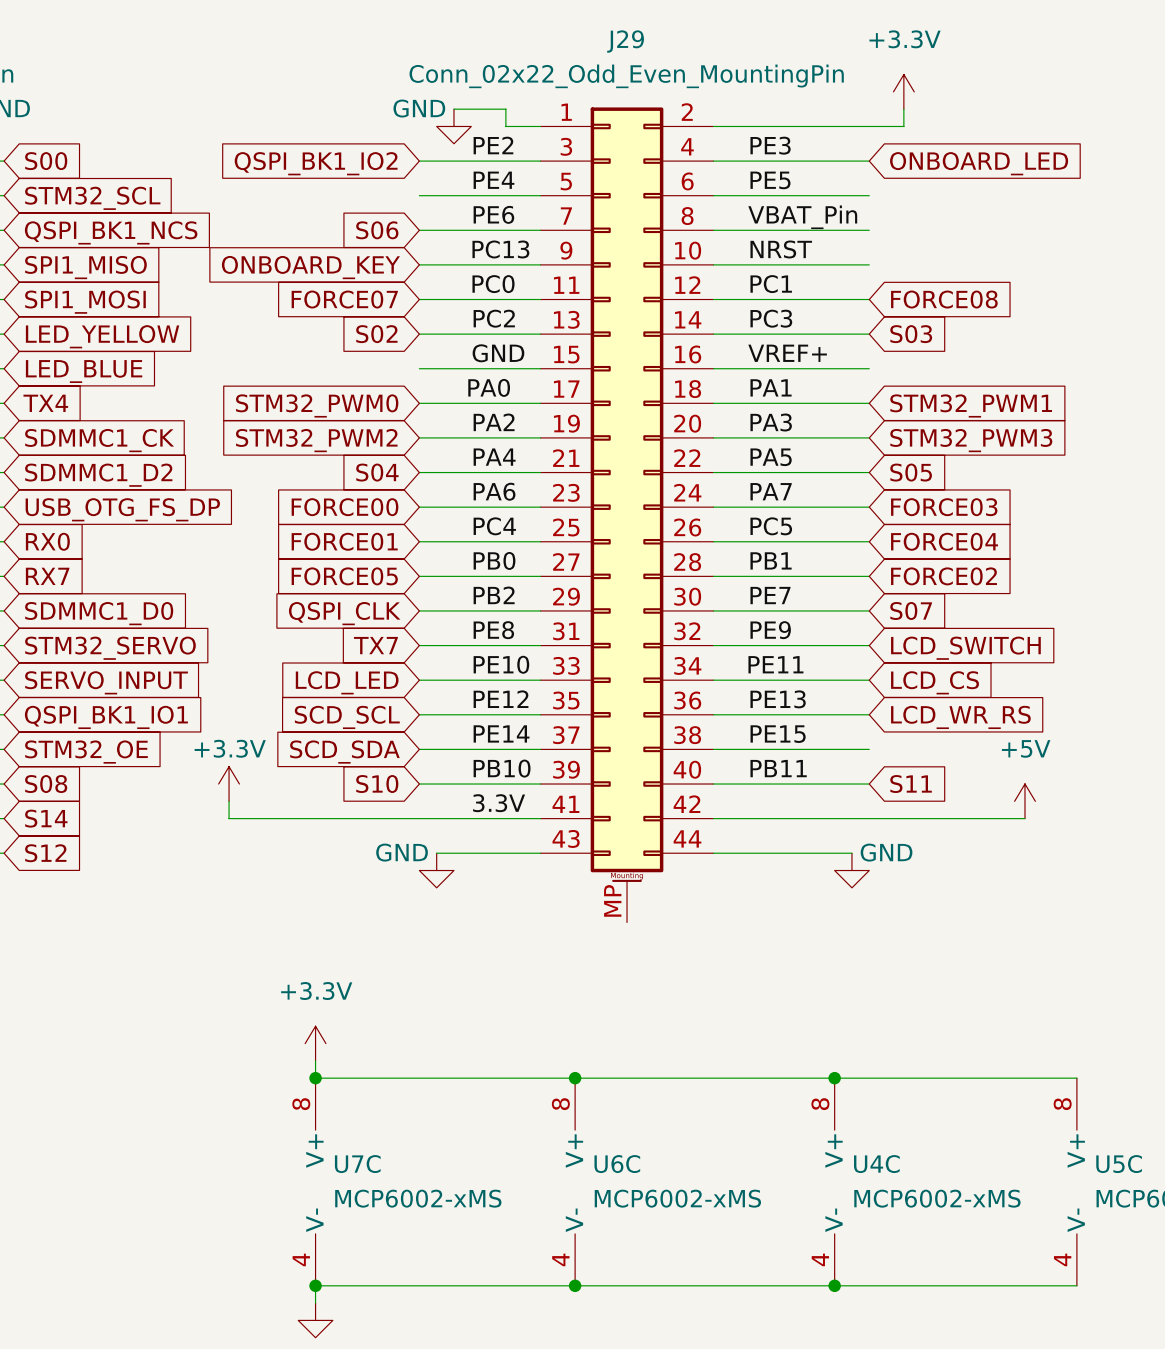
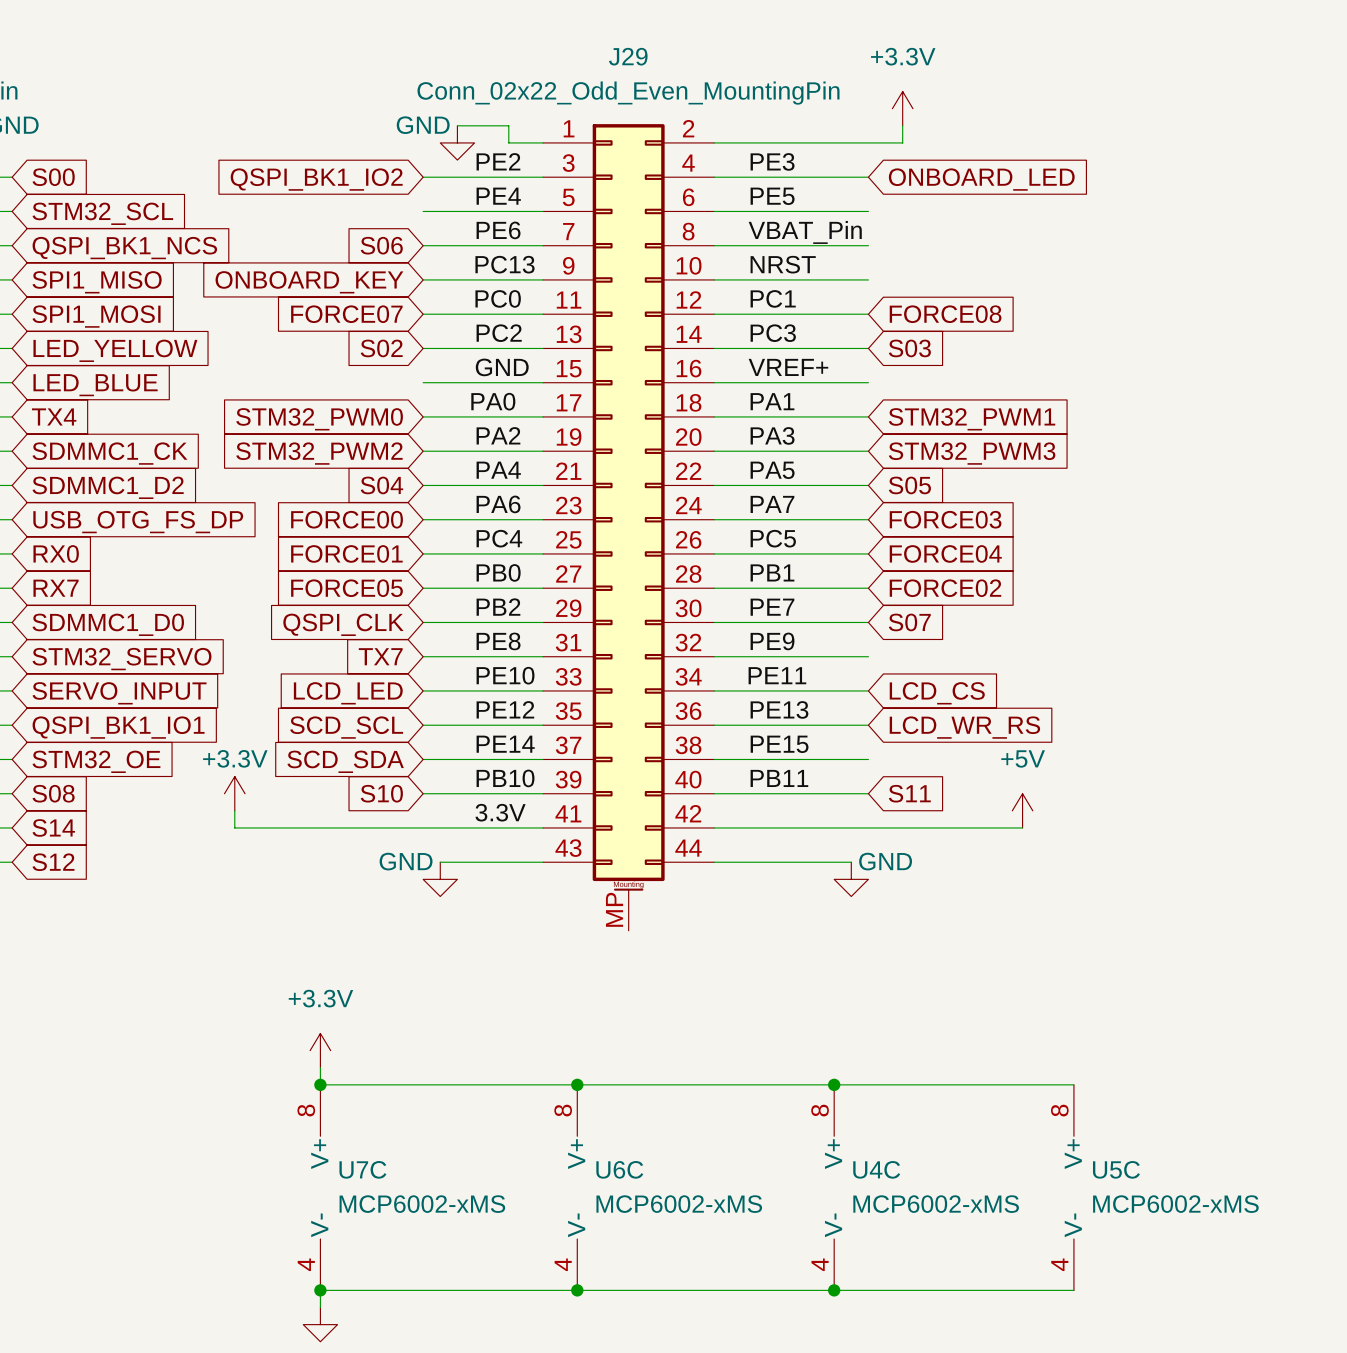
global label: LCD_SWITCH (965, 648) -> none

